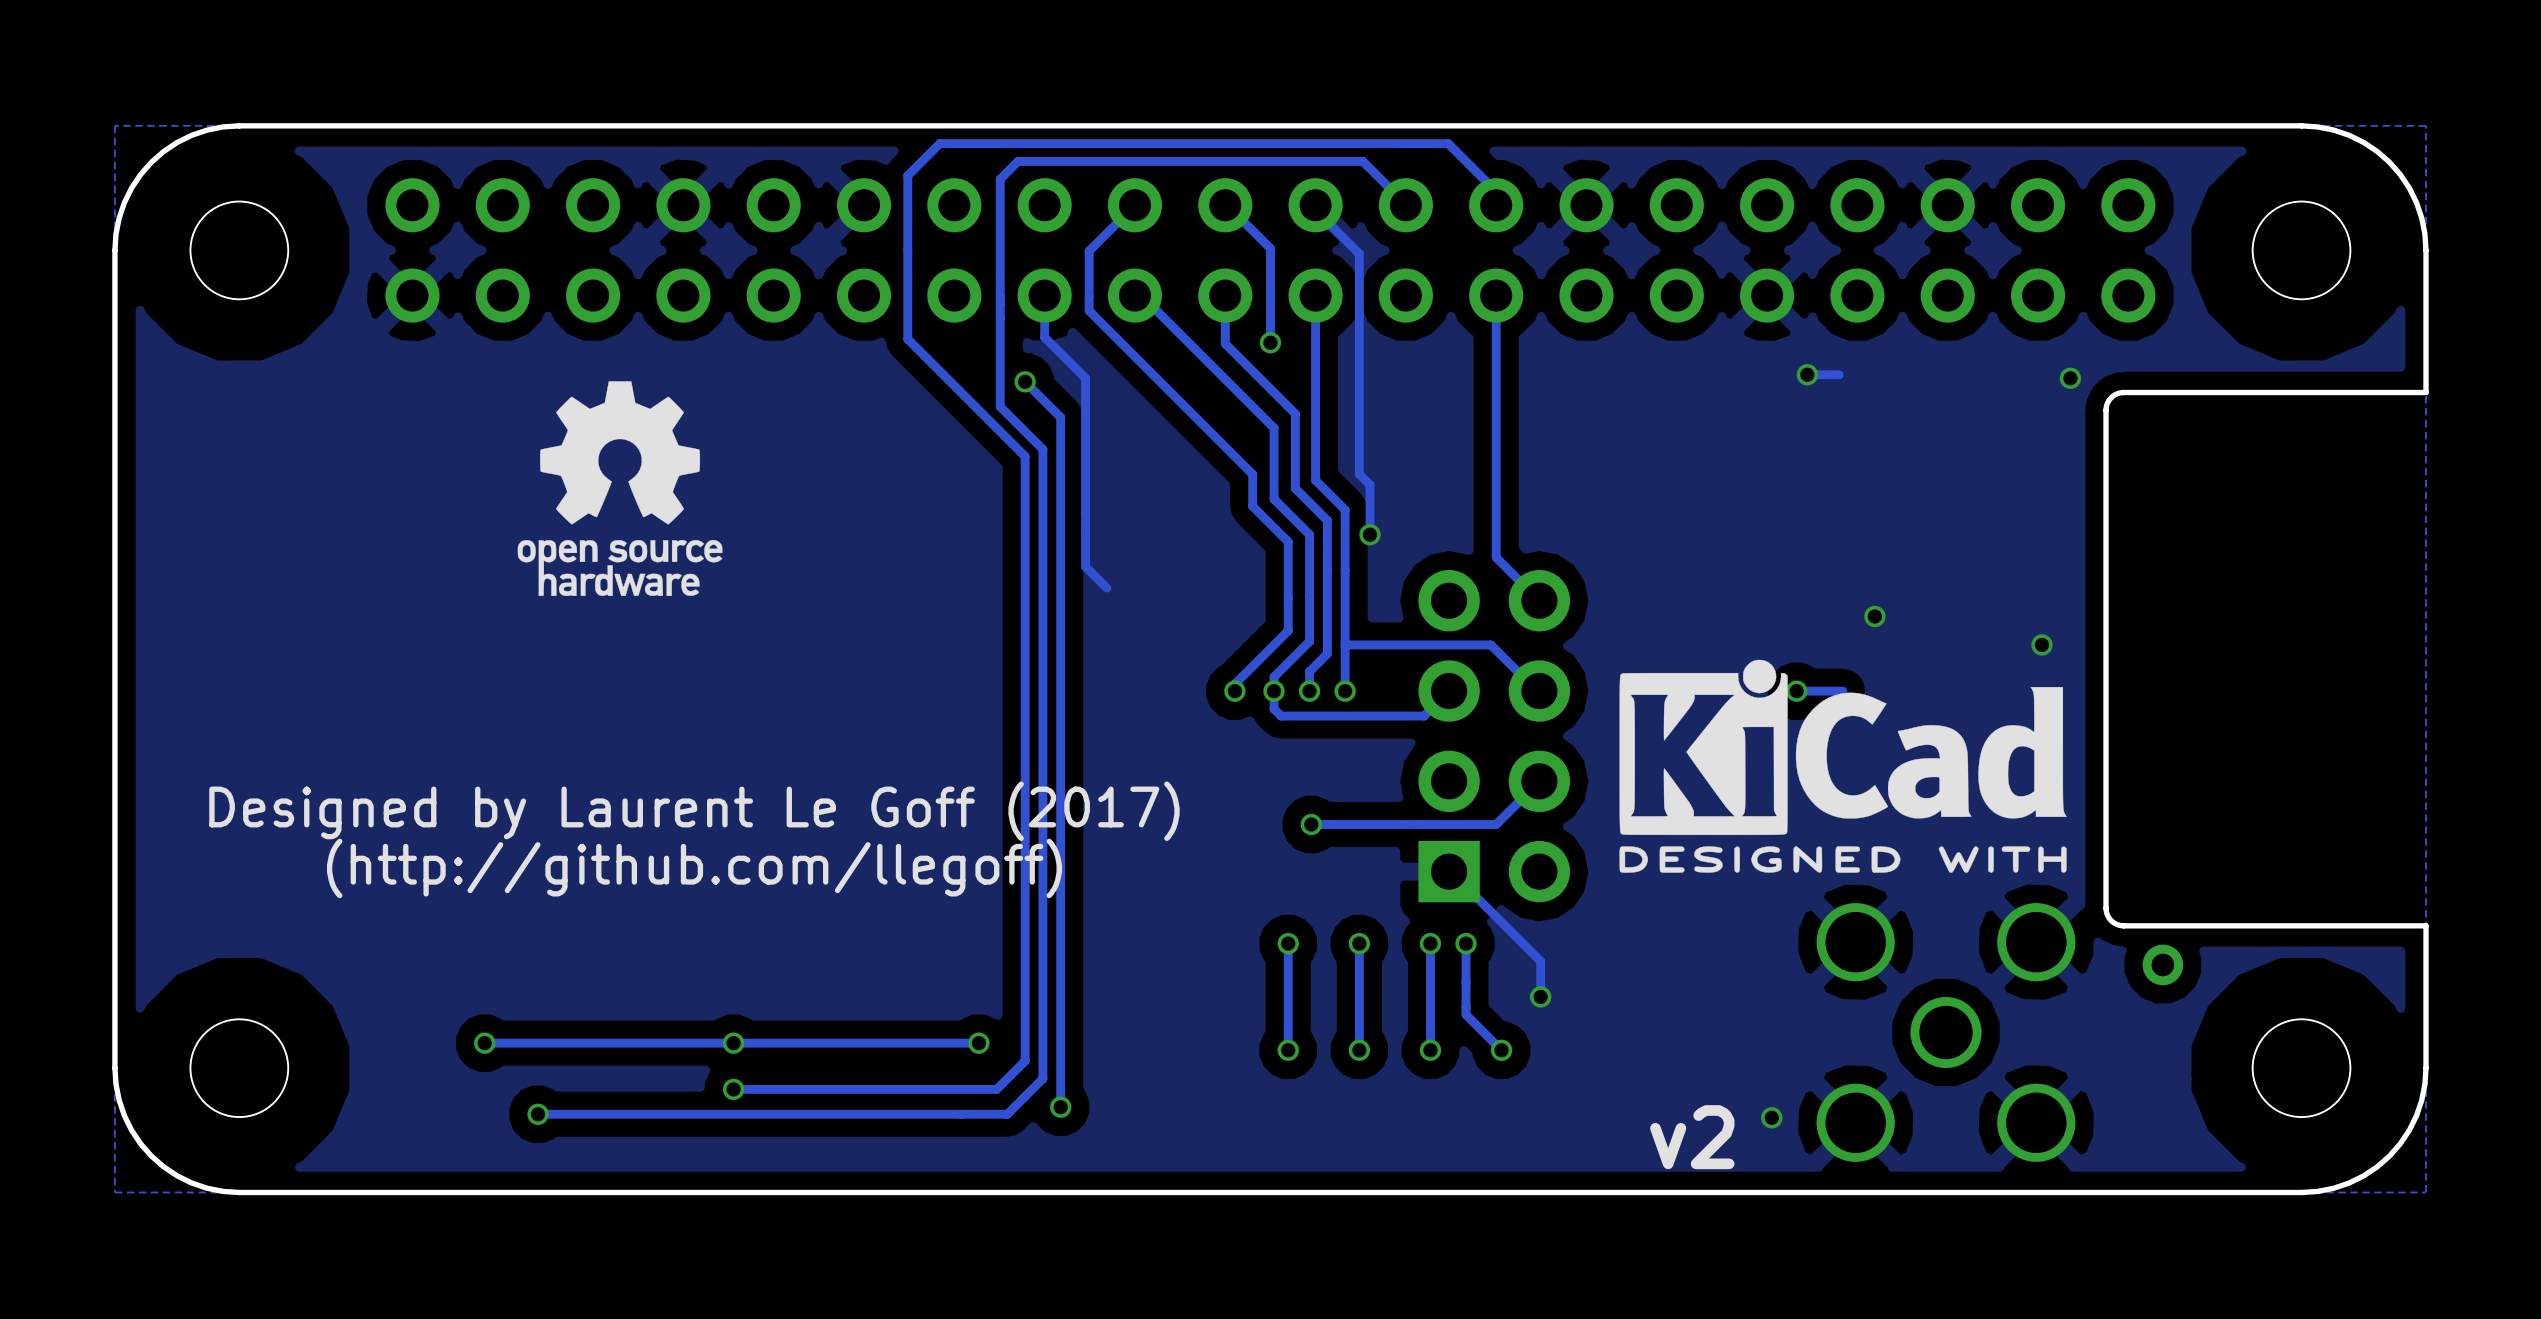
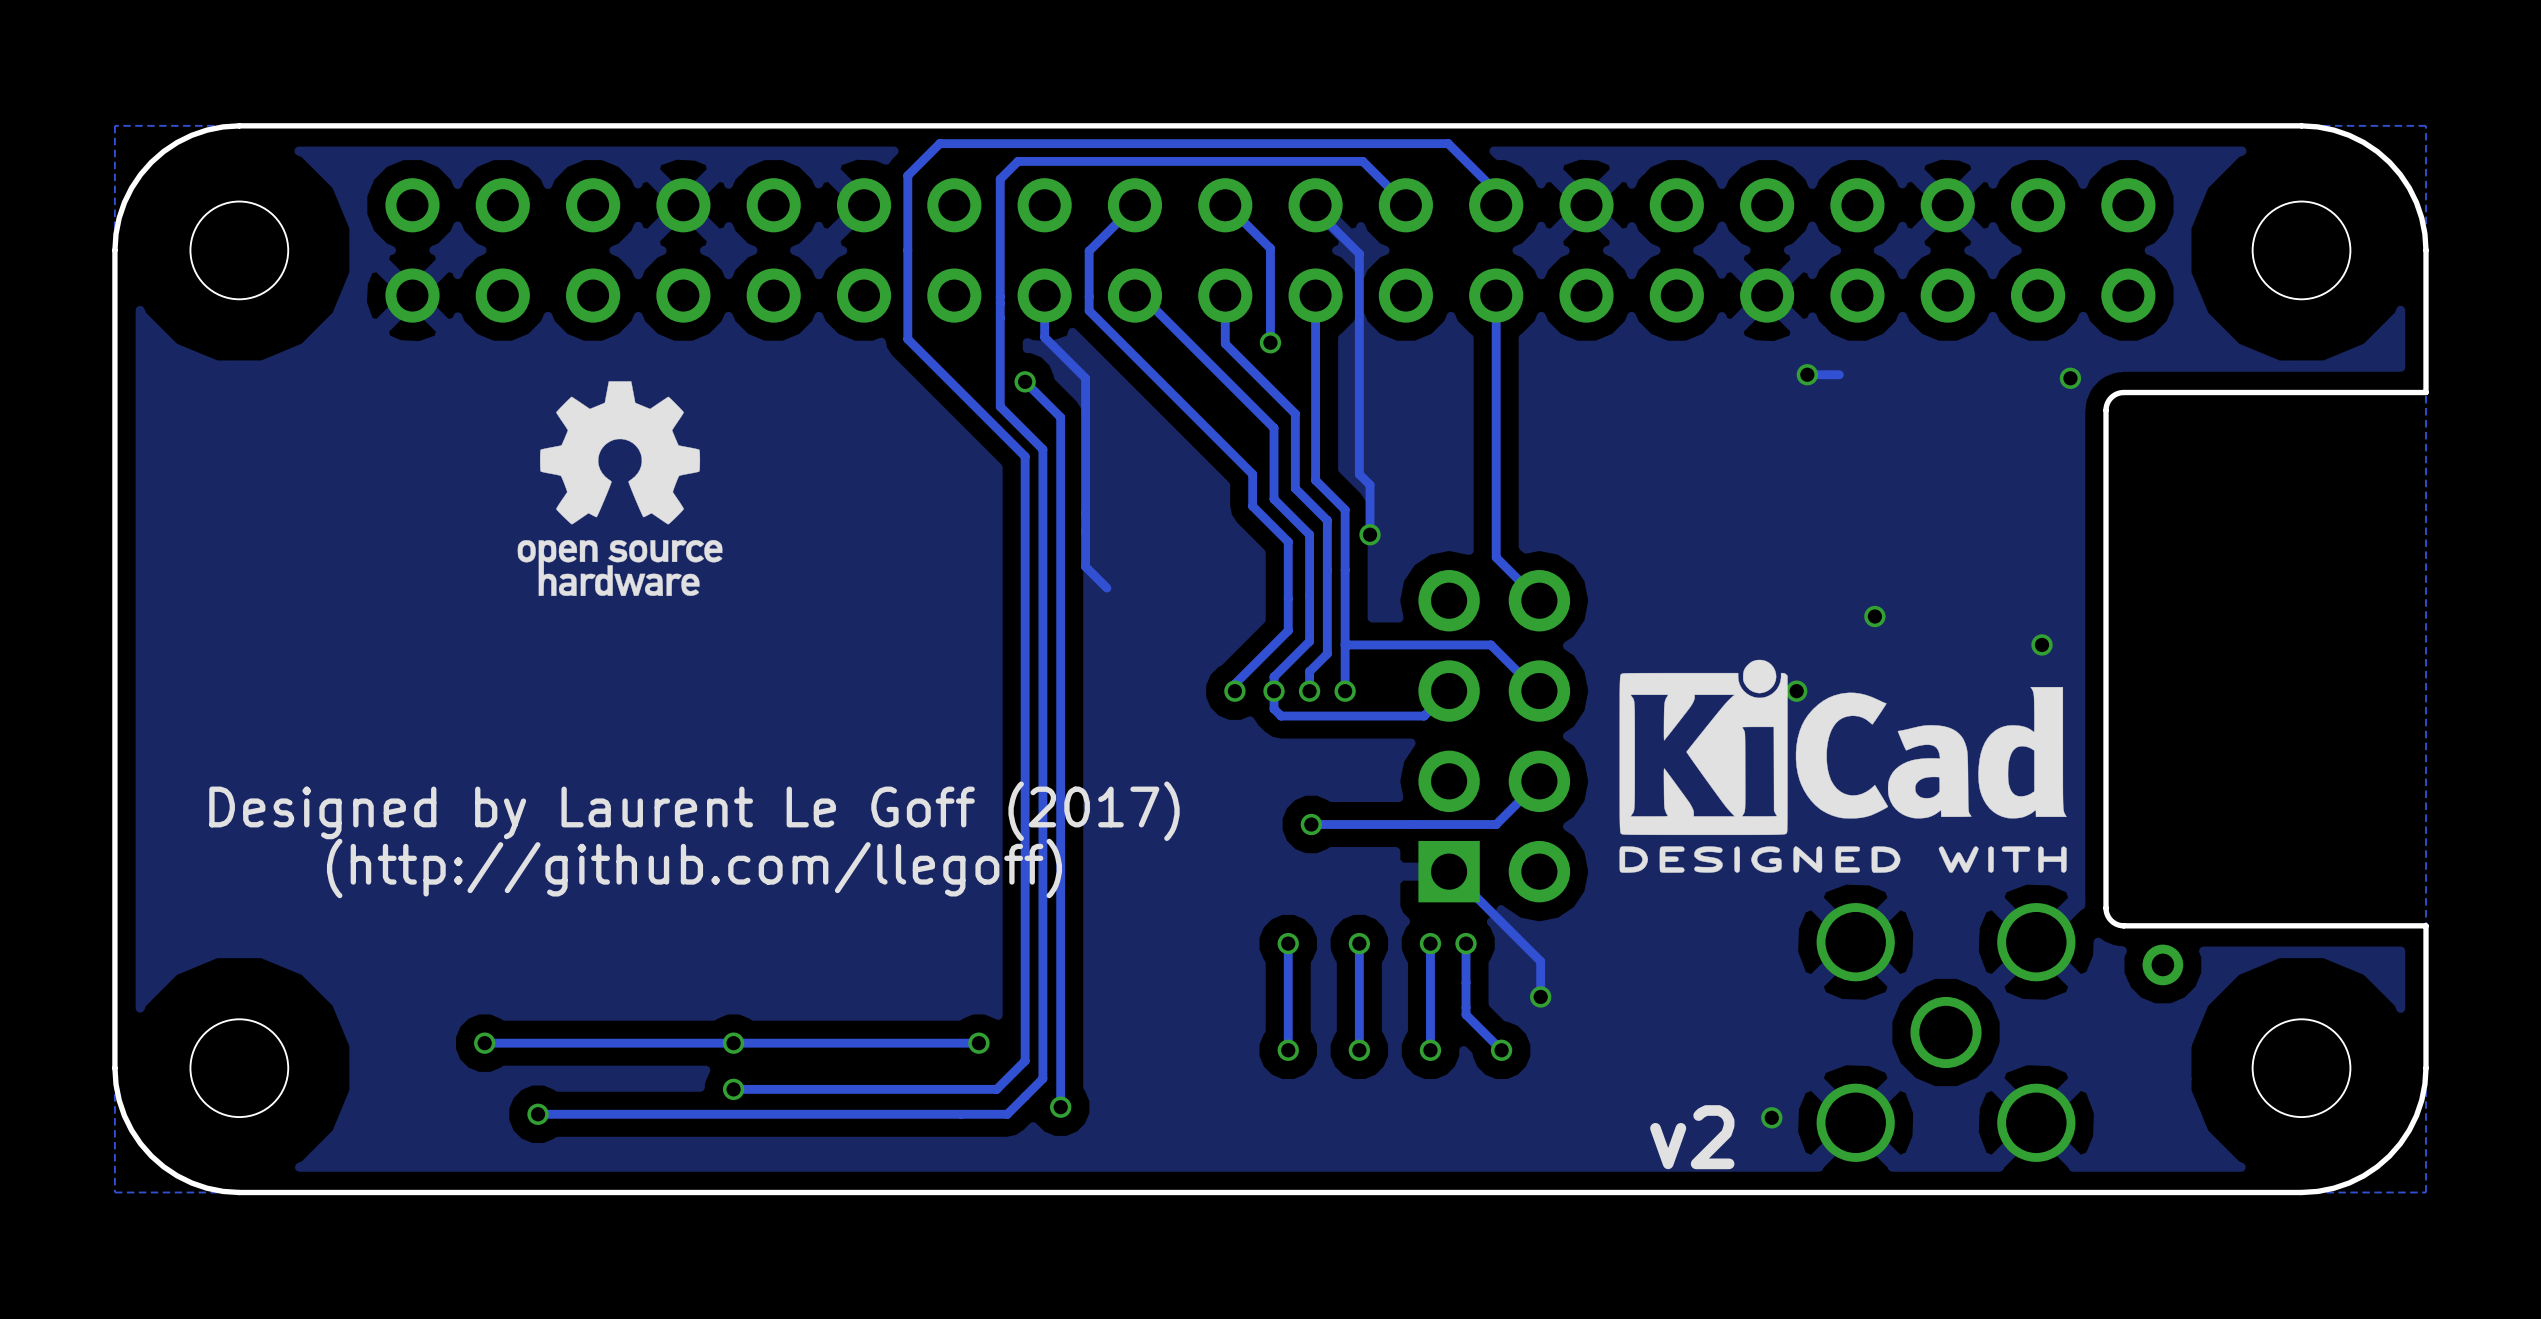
track: (1842, 691) (1796, 691) -> none

